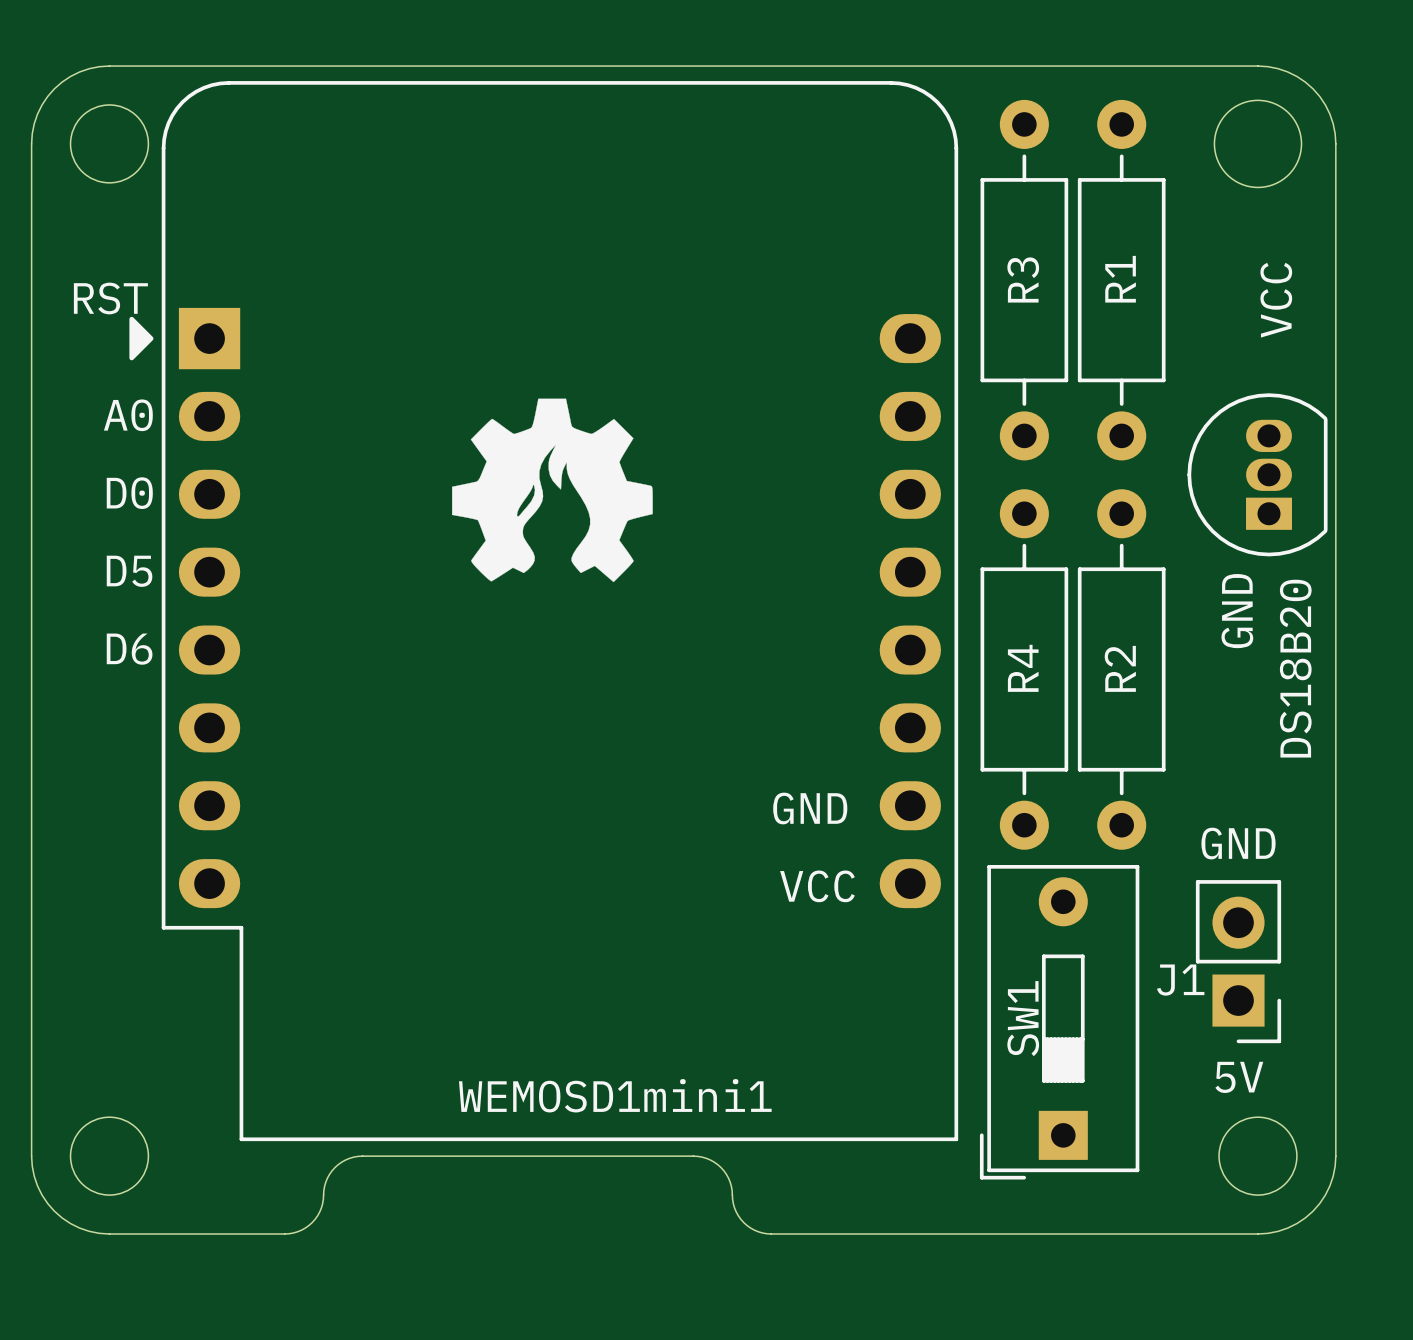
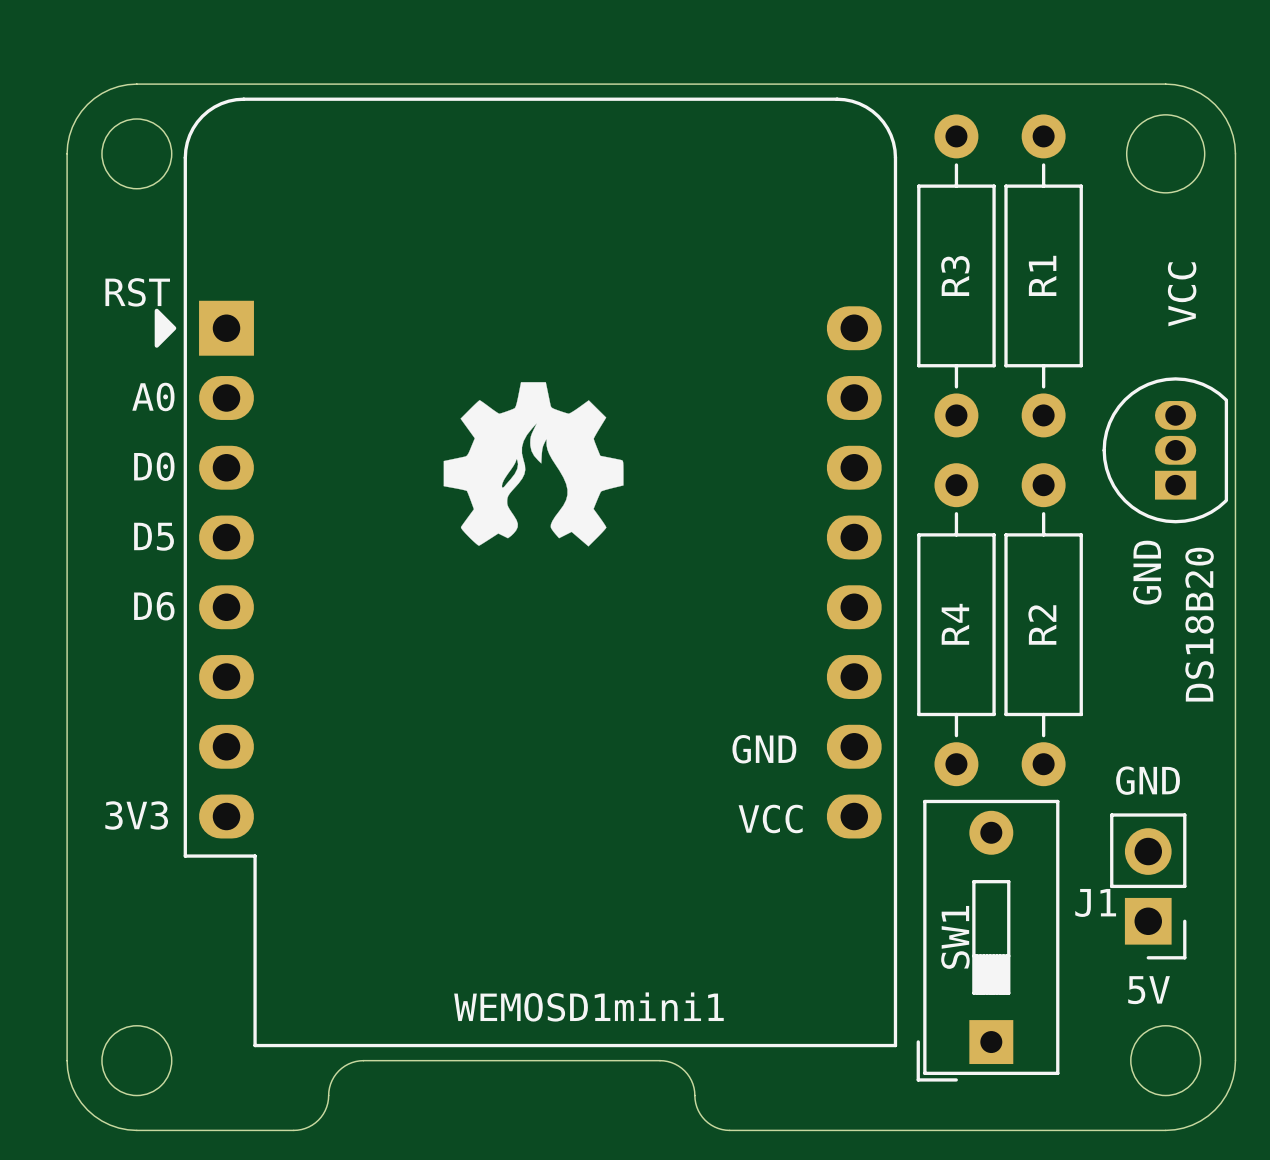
text: none -> 3V3 (136, 815)

